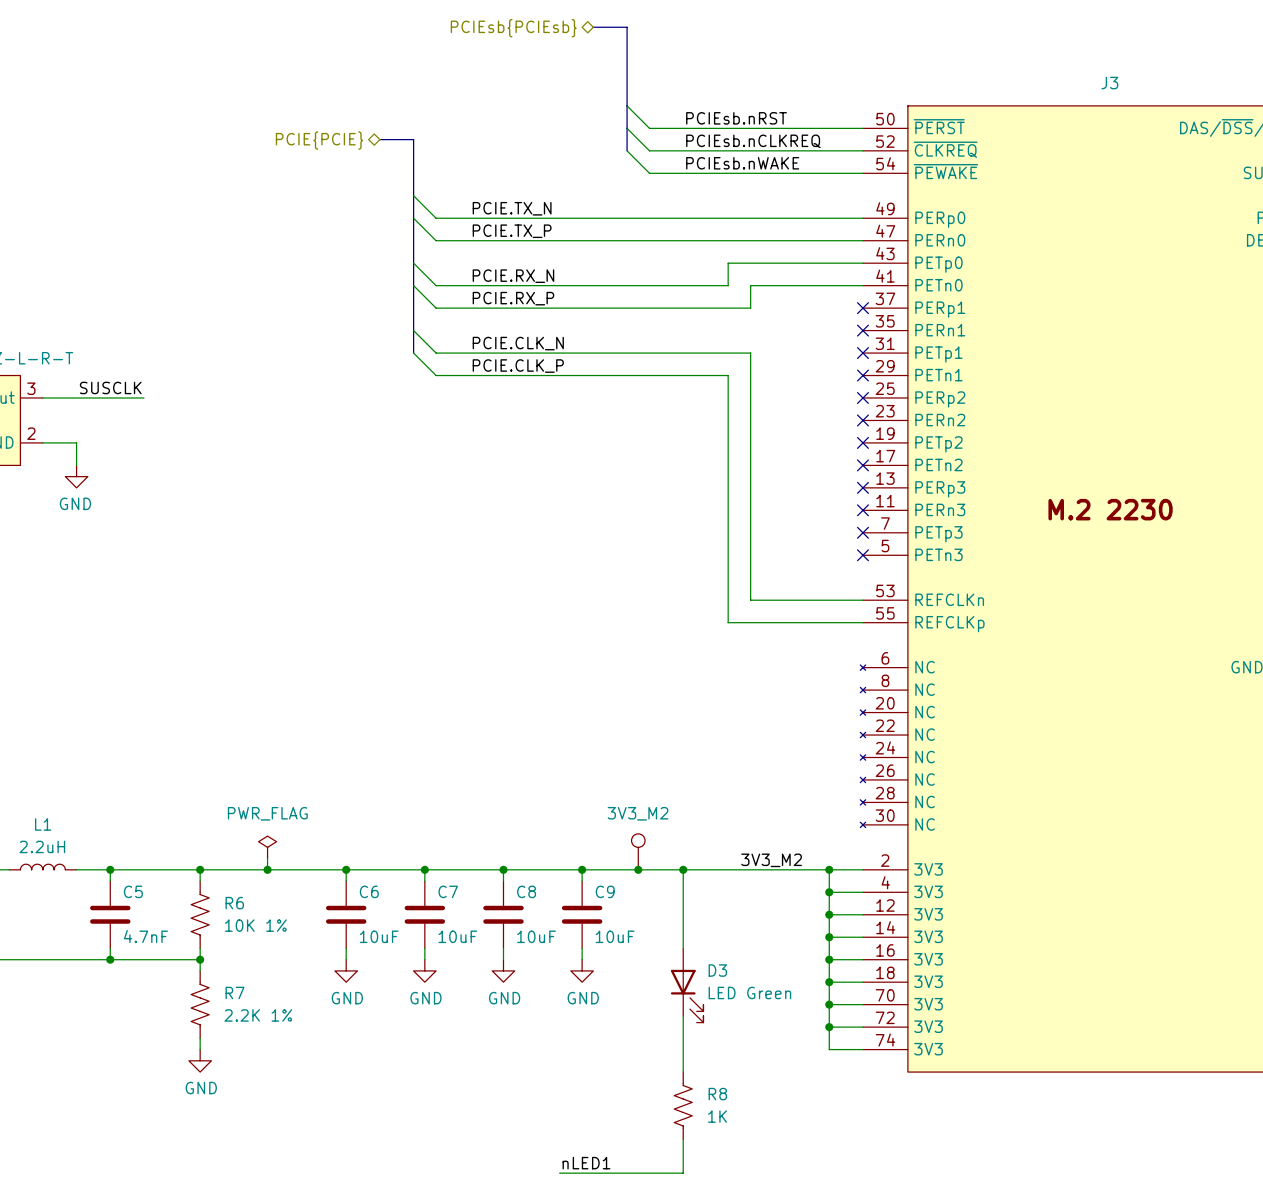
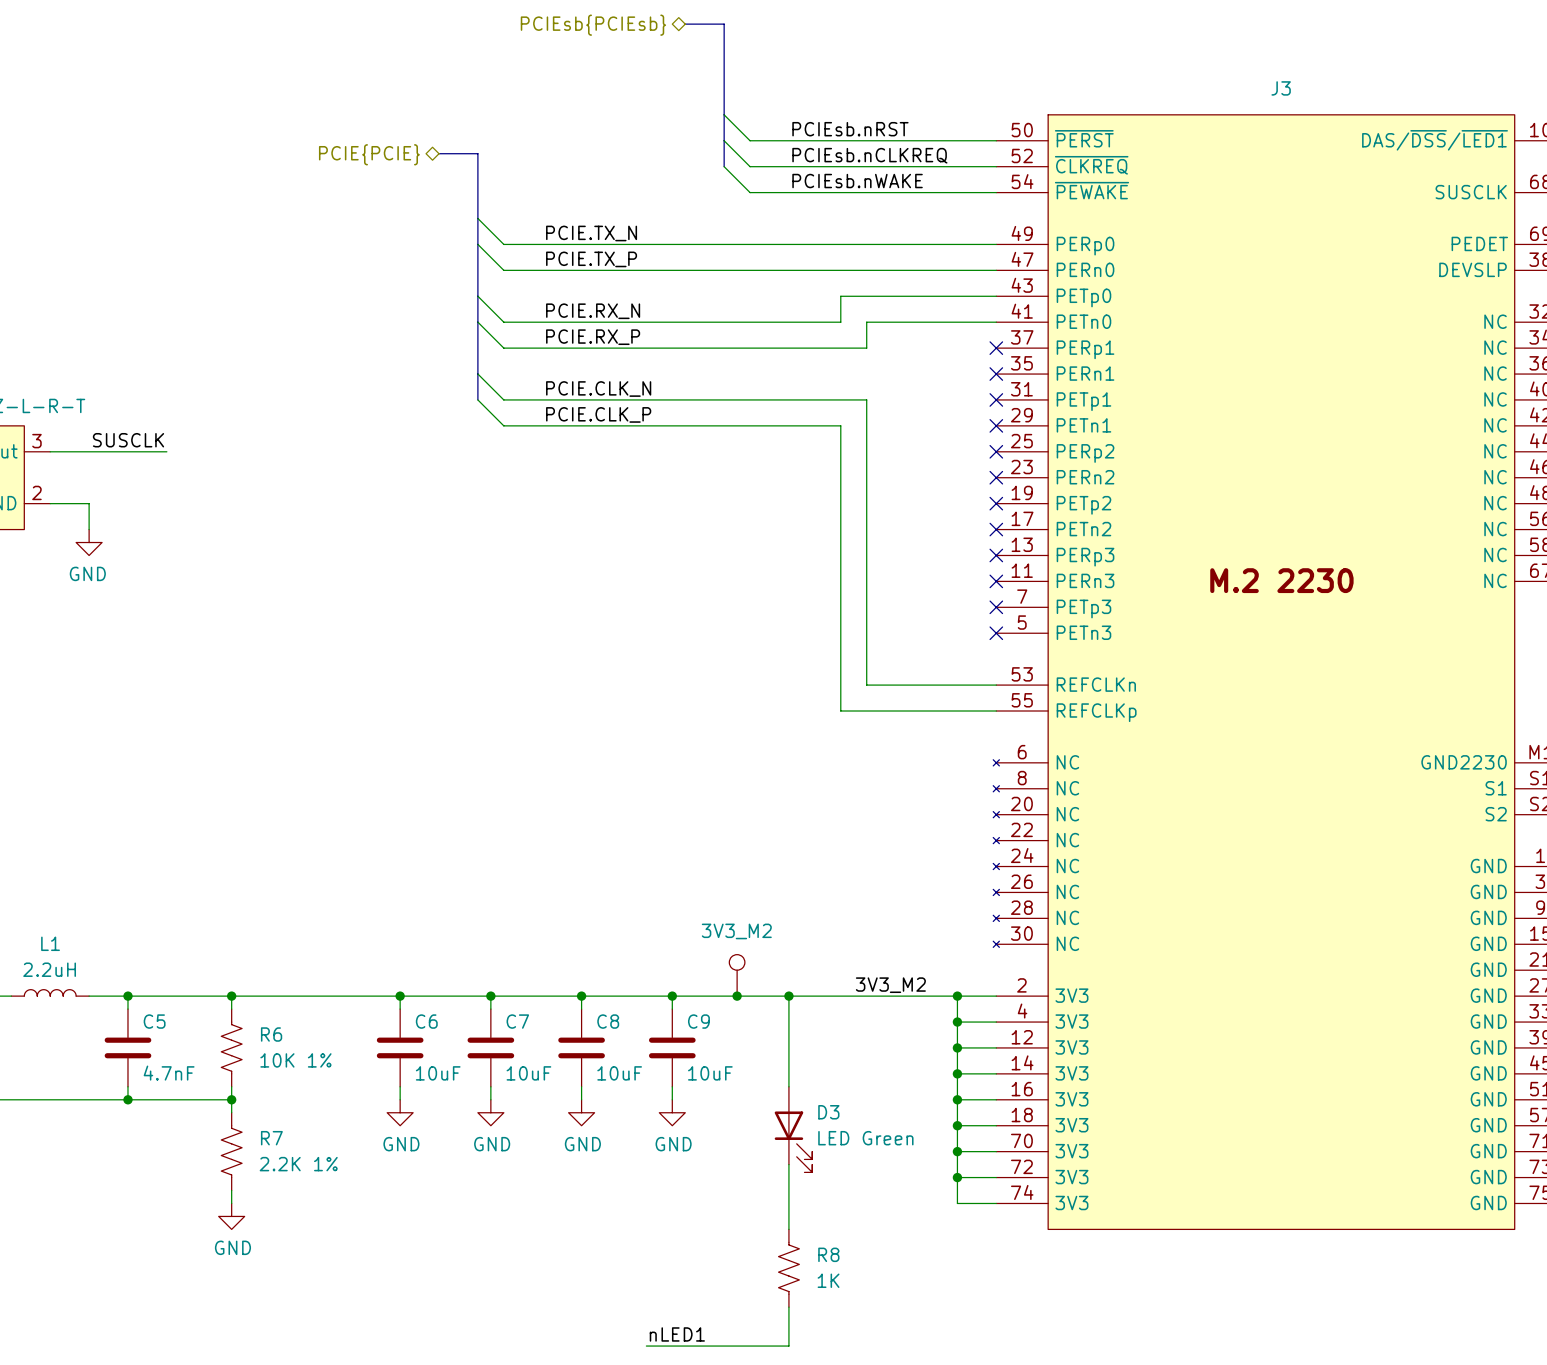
power symbol: PWR_FLAG (267, 847) -> none
wire: (267, 858) (267, 869) -> none
junction: (267, 869) -> none

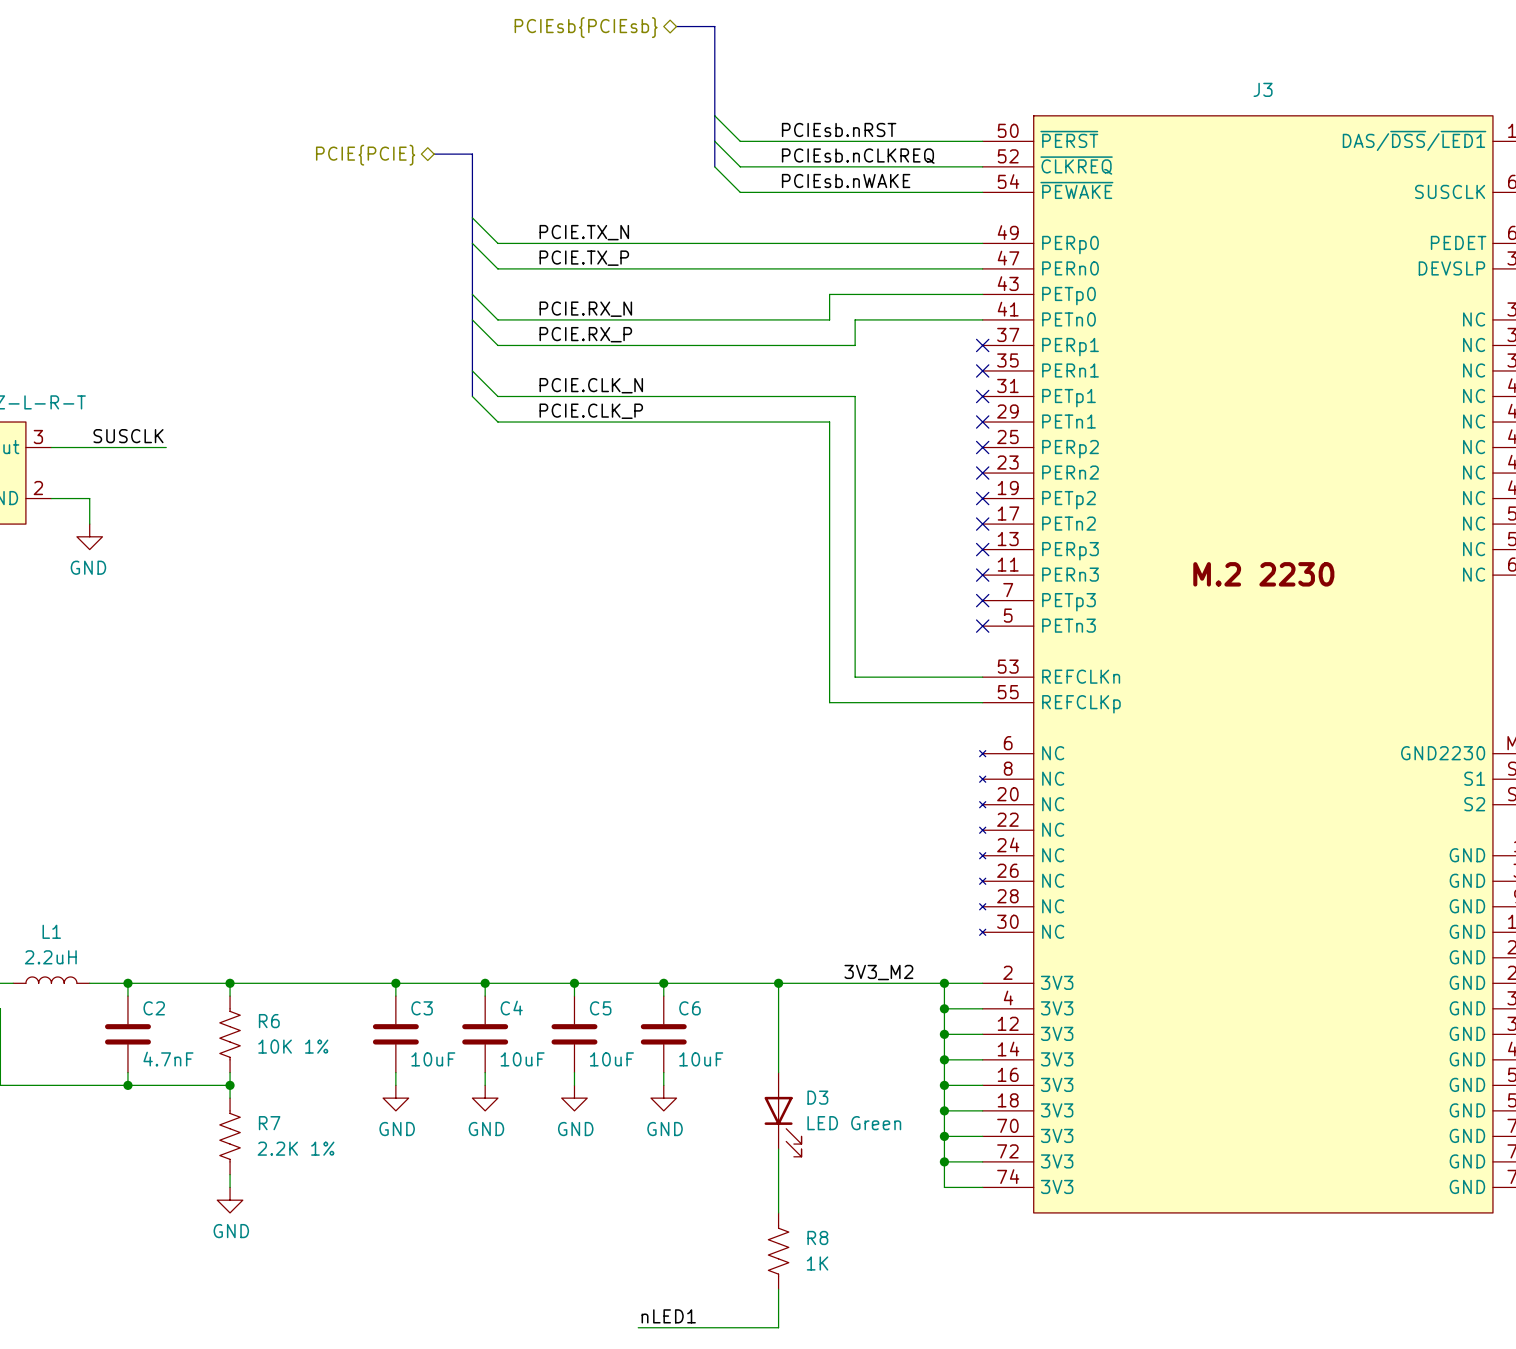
3V3_M2: (737, 975) -> none
junction: (737, 996) -> none
C5 name: C5 (154, 1021) -> C2 (154, 1008)
C6 name: C6 (426, 1021) -> C3 (422, 1008)
C7 name: C7 (517, 1021) -> C4 (511, 1008)
C8 name: C8 (608, 1021) -> C5 (600, 1008)
C9 name: C9 (698, 1021) -> C6 (689, 1008)

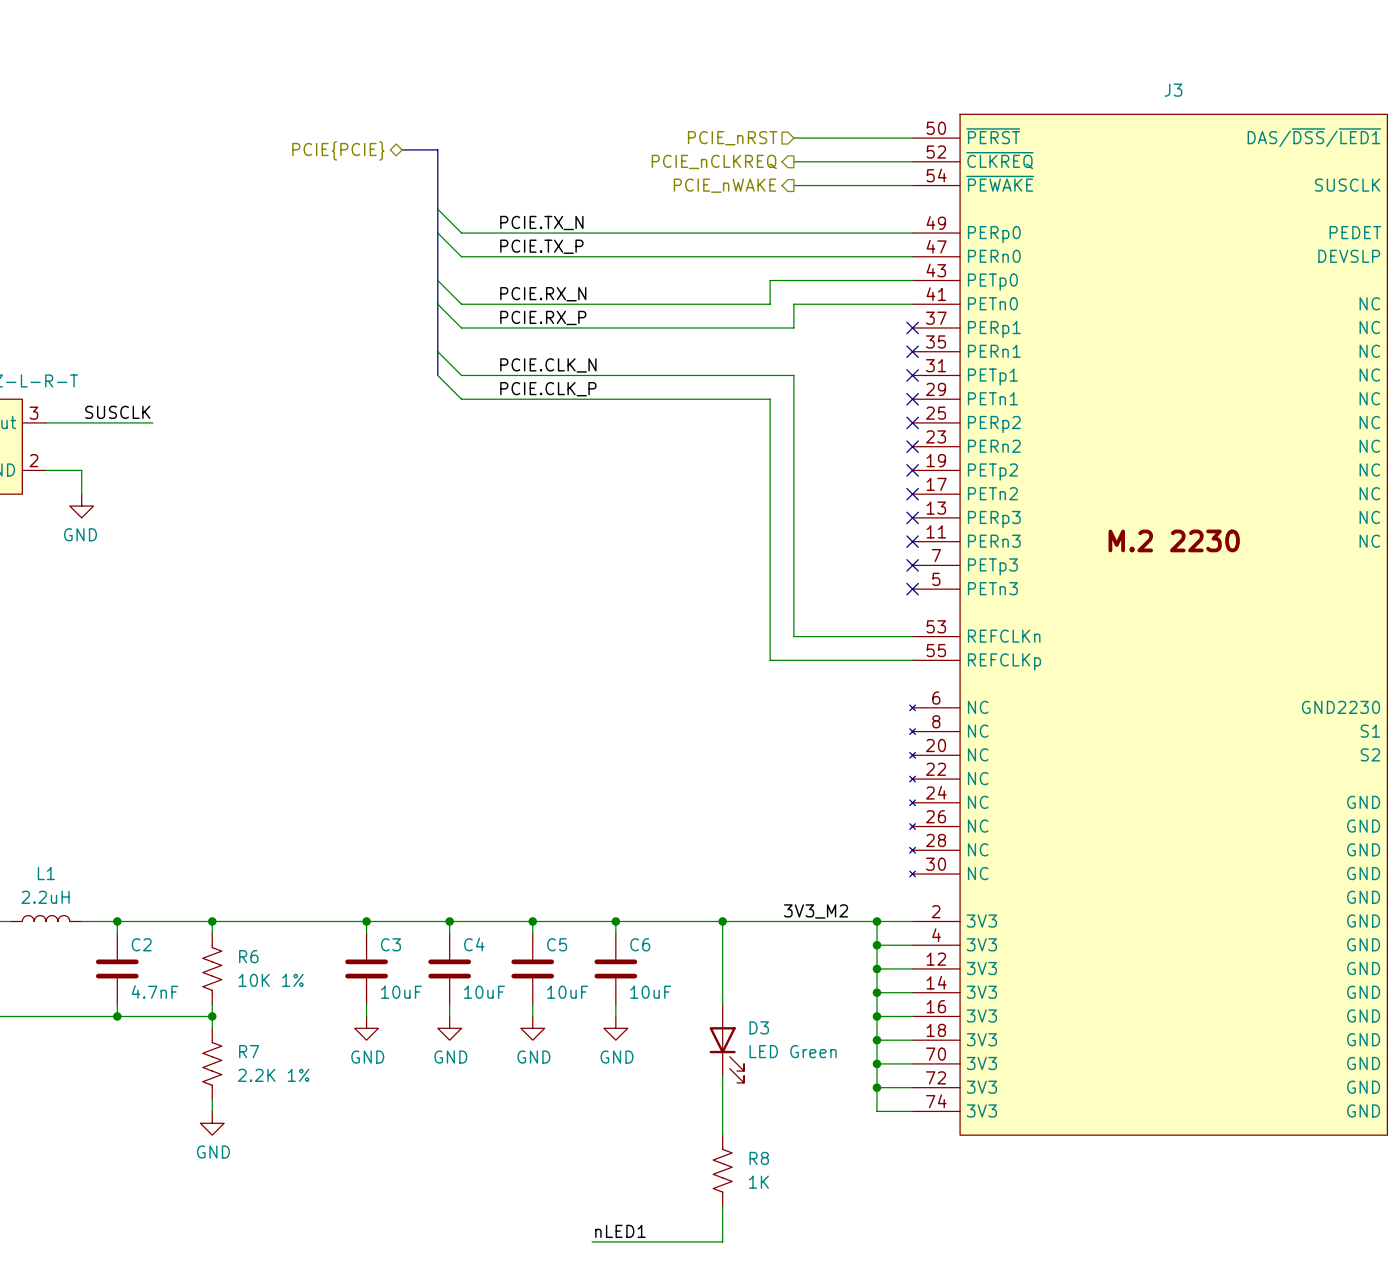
bus: (676, 26) (714, 26) (714, 166) -> none
hierarchical label: PCIEsb{PCIEsb} (586, 27) -> none
wire: (714, 115) (740, 141) (855, 141) -> none
label: PCIEsb.nRST (839, 129) -> none
wire: (714, 141) (740, 166) (855, 166) -> none
hierarchical label: none -> PCIE_nRST (732, 138)
label: PCIEsb.nCLKREQ (858, 156) -> none
wire: (714, 166) (740, 192) (855, 192) -> none
hierarchical label: none -> PCIE_nCLKREQ (714, 161)
label: PCIEsb.nWAKE (846, 181) -> none
hierarchical label: none -> PCIE_nWAKE (725, 185)

